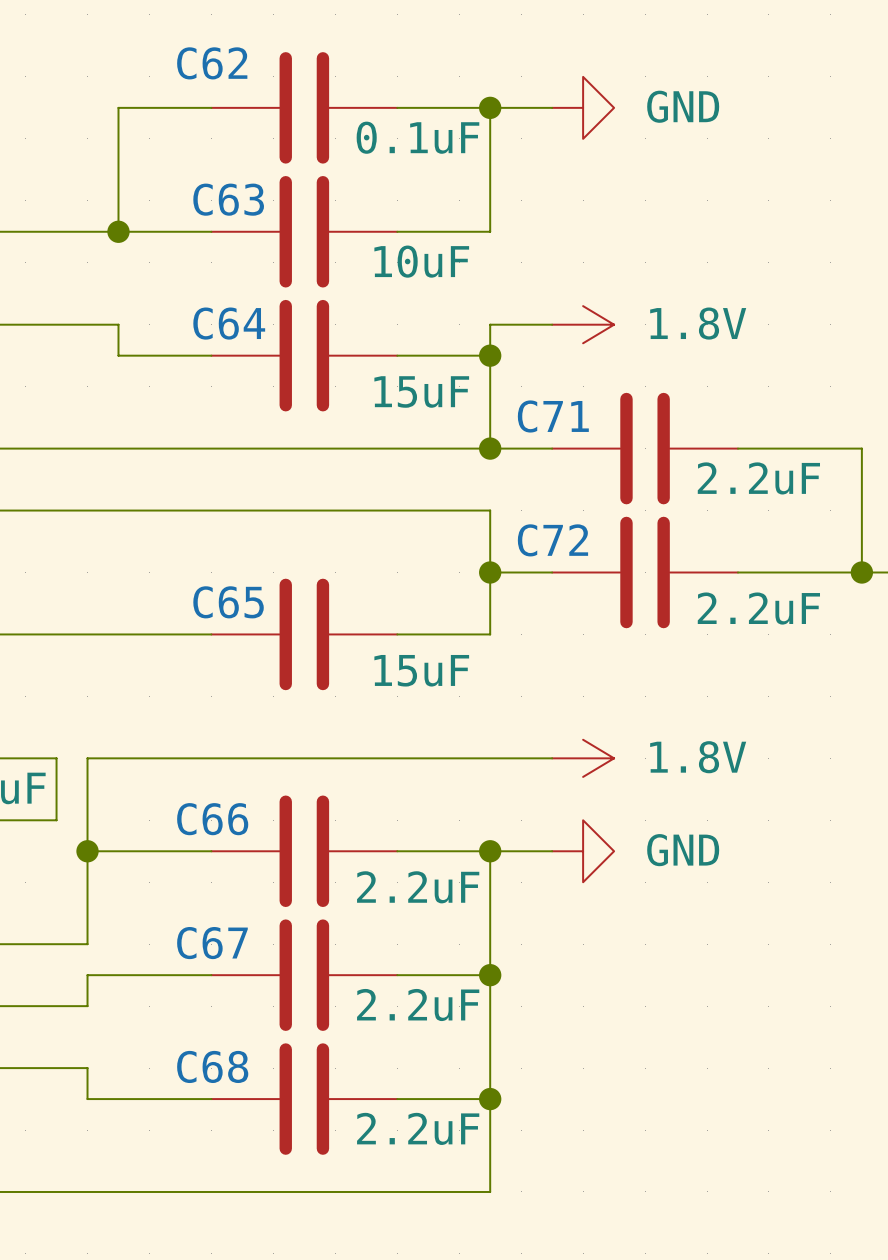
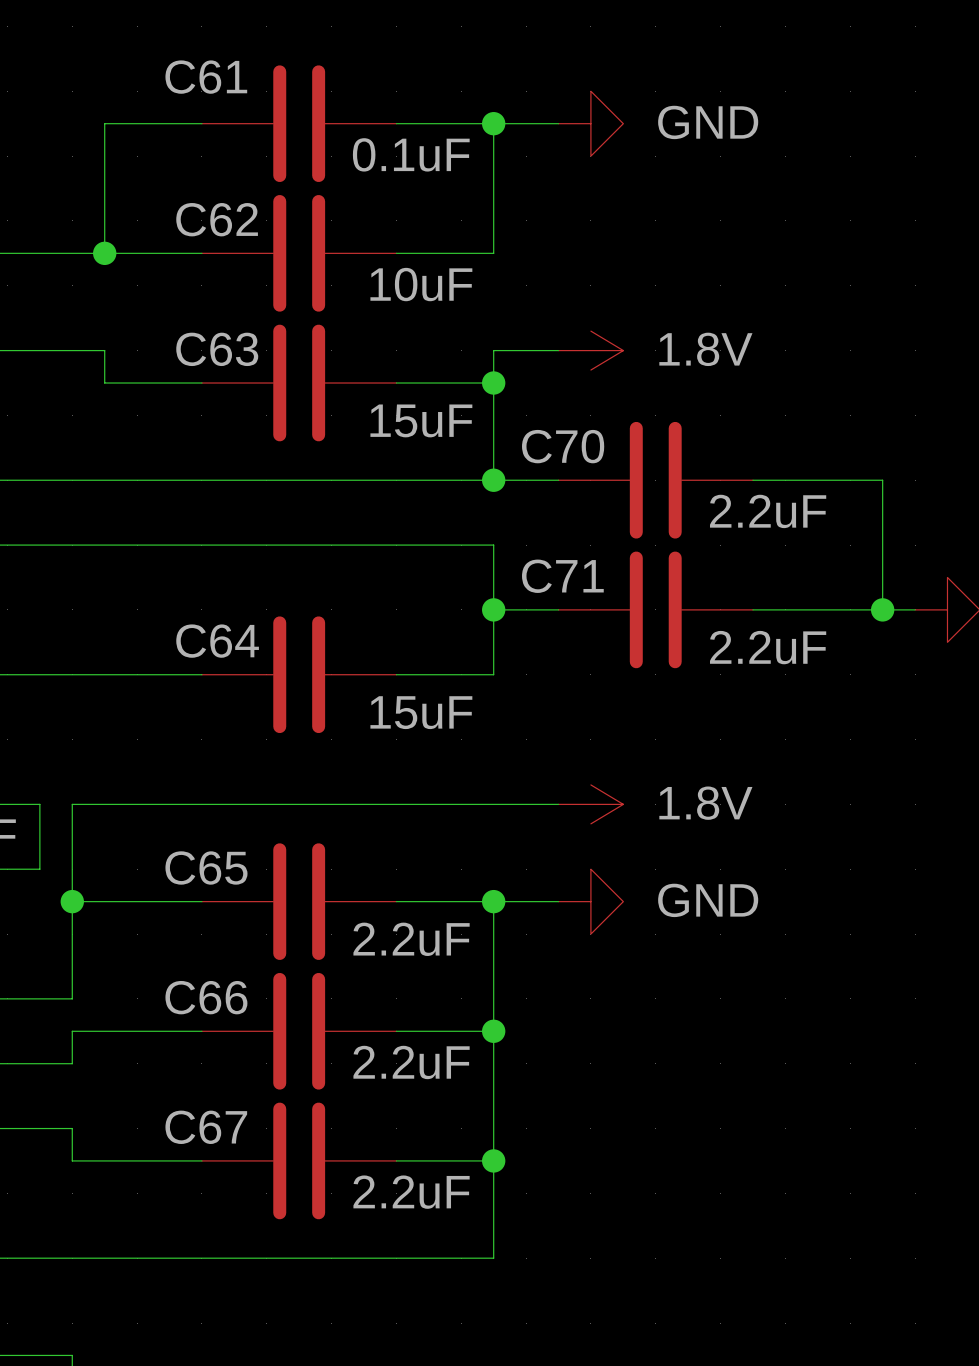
C62 name: C62 (212, 63) -> C61 (206, 77)
C63 name: C63 (228, 199) -> C62 (217, 219)
C64 name: C64 (229, 323) -> C63 (217, 349)
C71 name: C71 (553, 416) -> C70 (563, 446)
C72 name: C72 (552, 540) -> C71 (562, 576)
C65 name: C65 (228, 602) -> C64 (217, 641)
C66 name: C66 (212, 819) -> C65 (206, 867)
C67 name: C67 (212, 943) -> C66 (206, 997)
C68 name: C68 (212, 1066) -> C67 (206, 1127)

